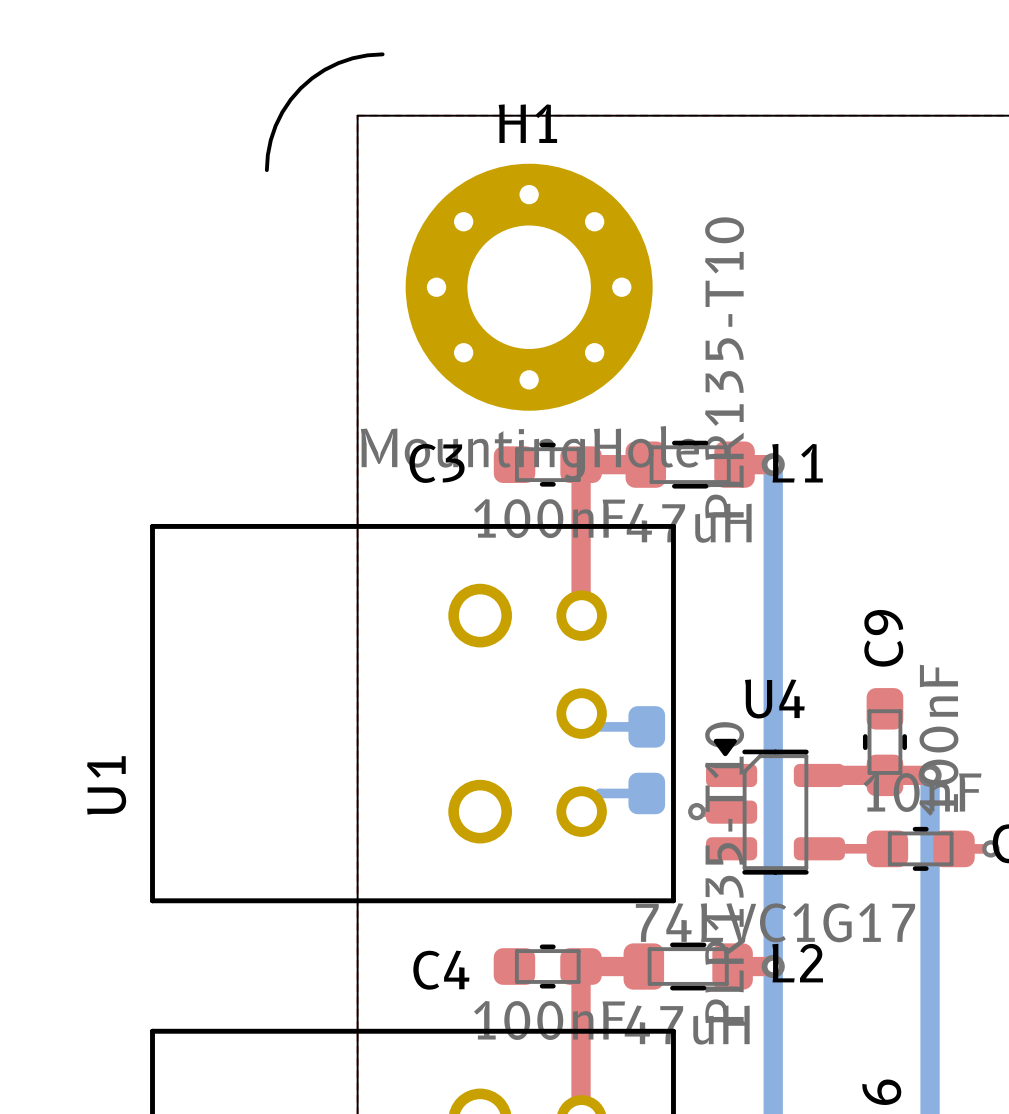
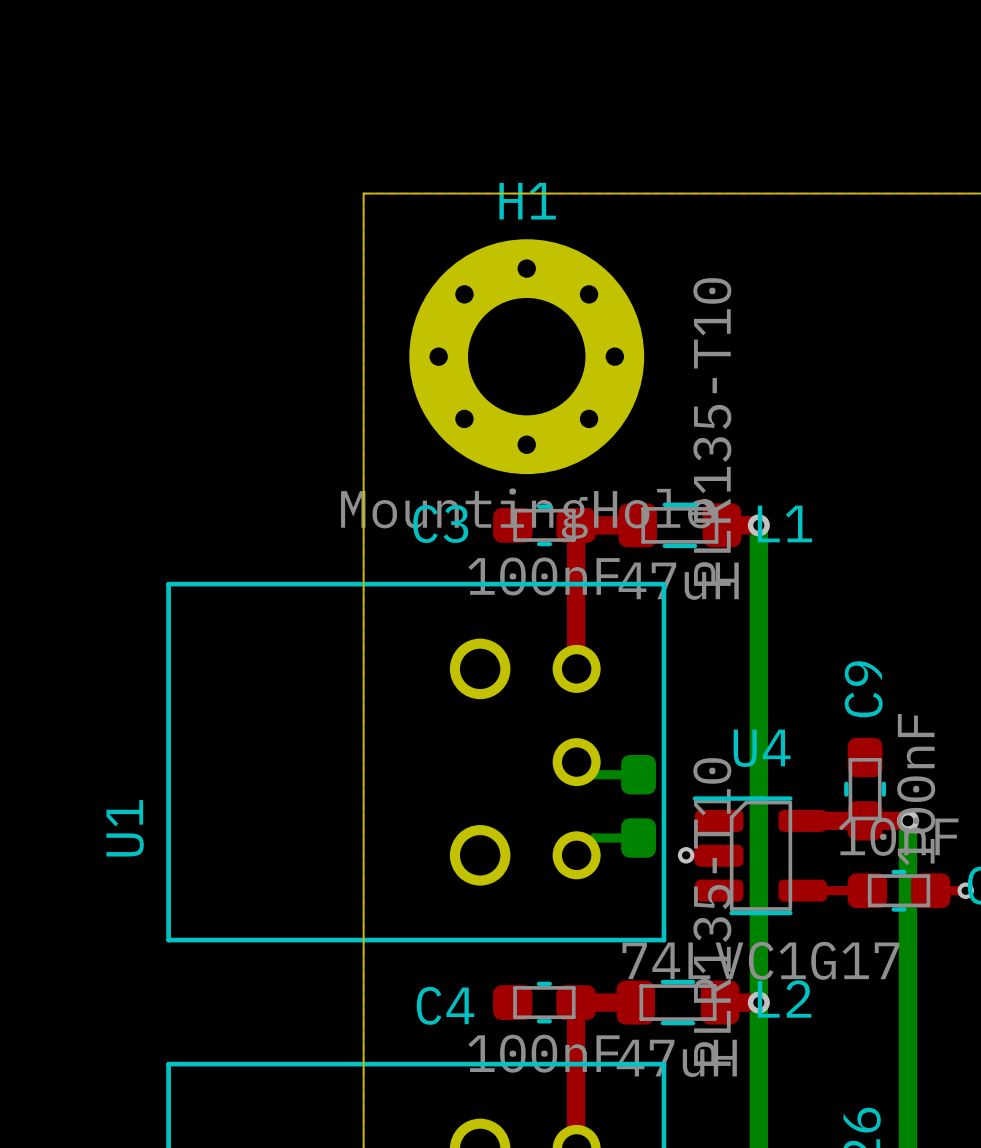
board edge: (382, 54) (352, 58) (338, 63) (312, 78) (300, 88) (282, 112) (275, 125) (267, 155) (266, 170) -> none
U4 footprint: [706, 738, 845, 875] -> [692, 796, 828, 916]

